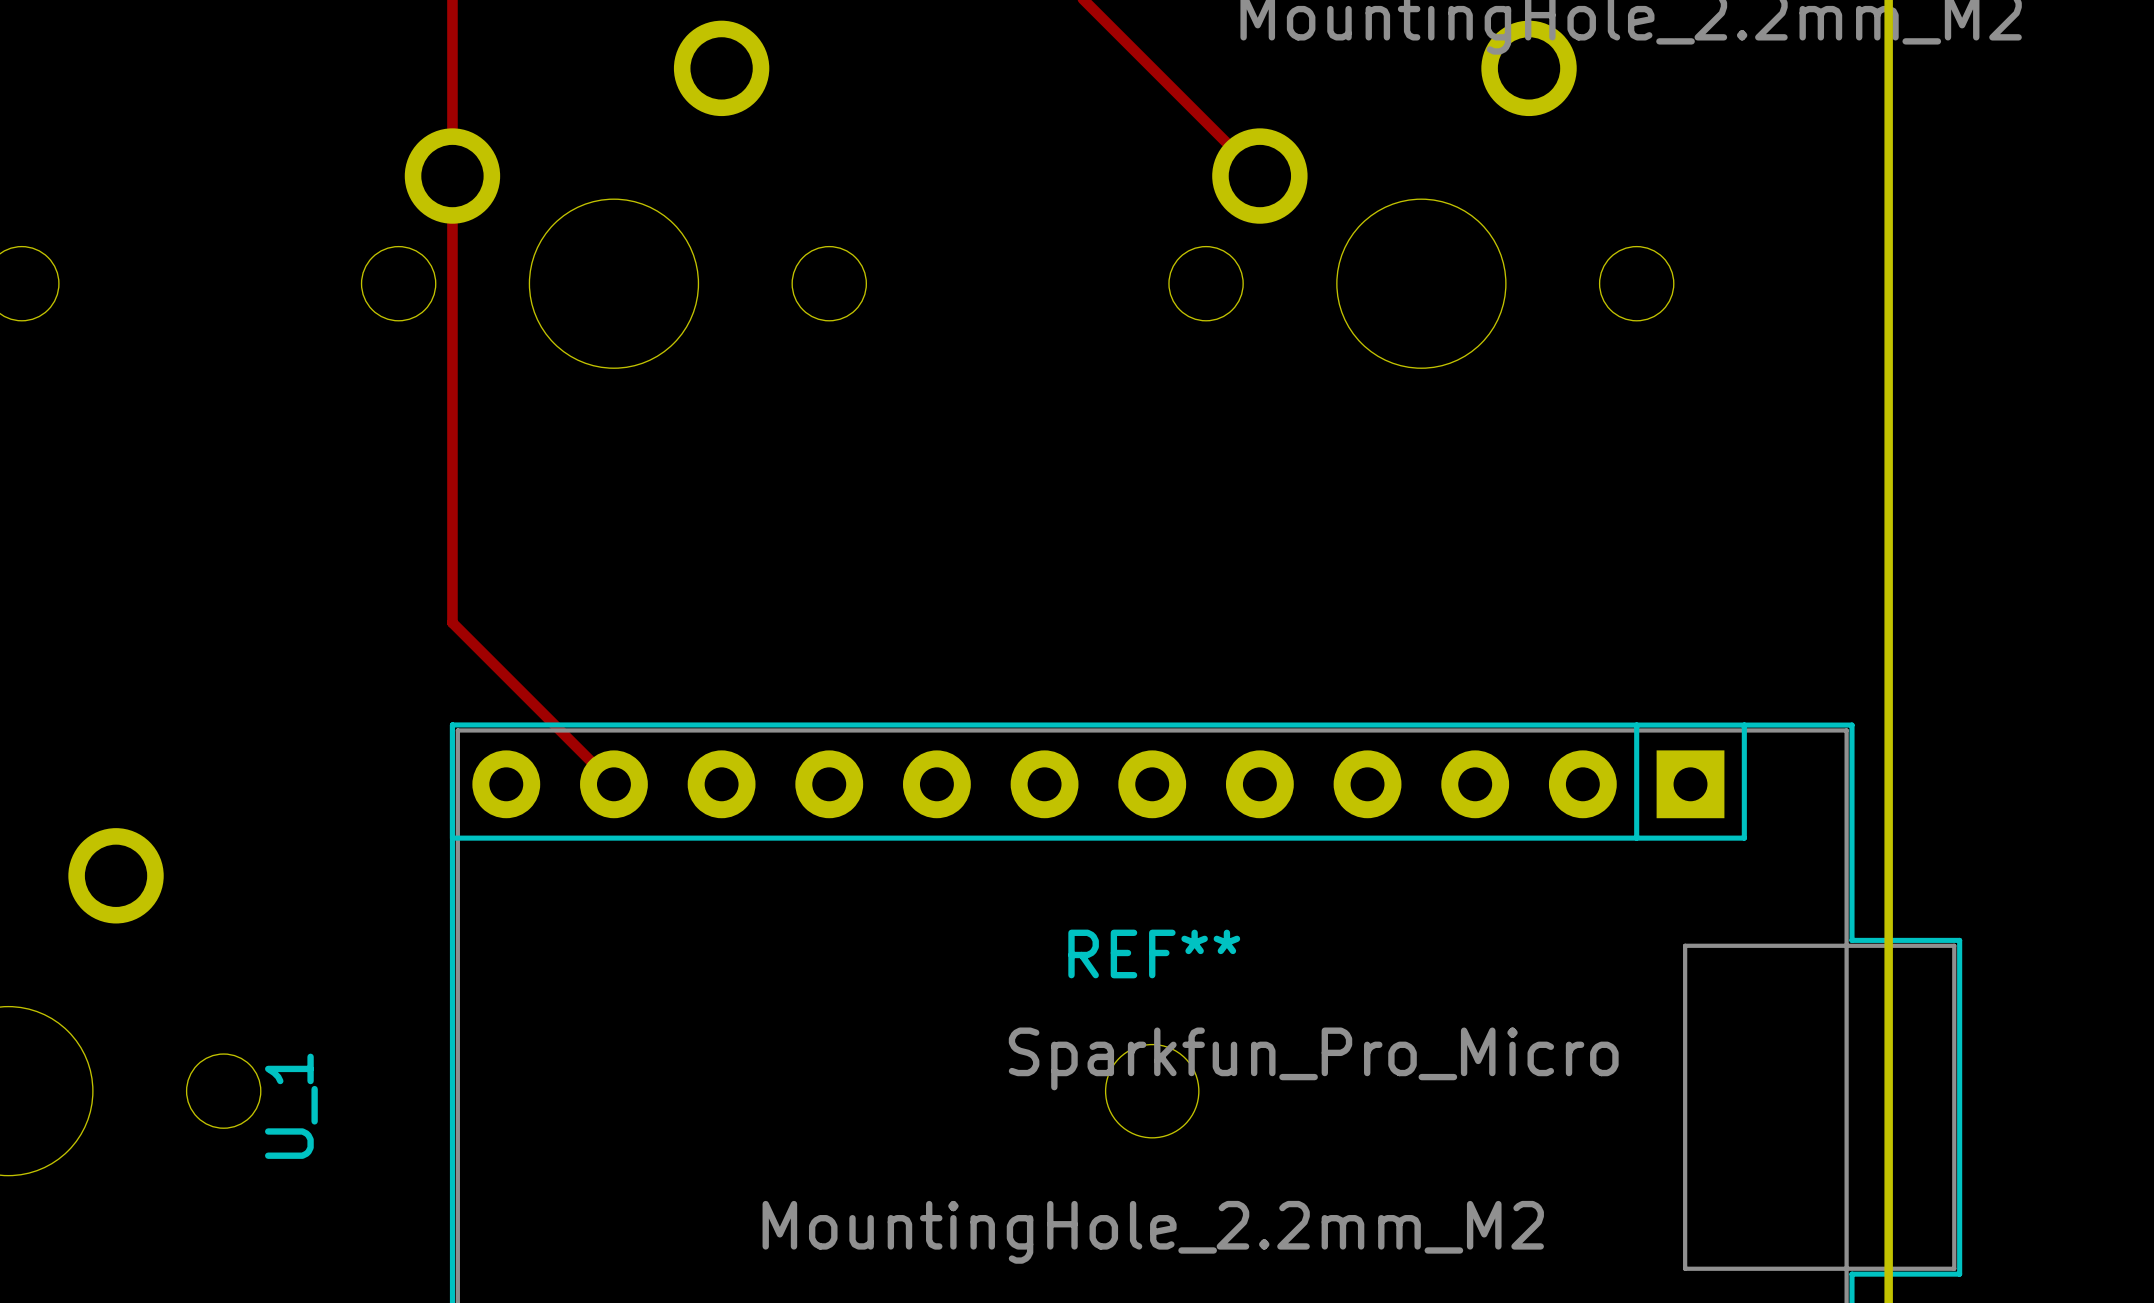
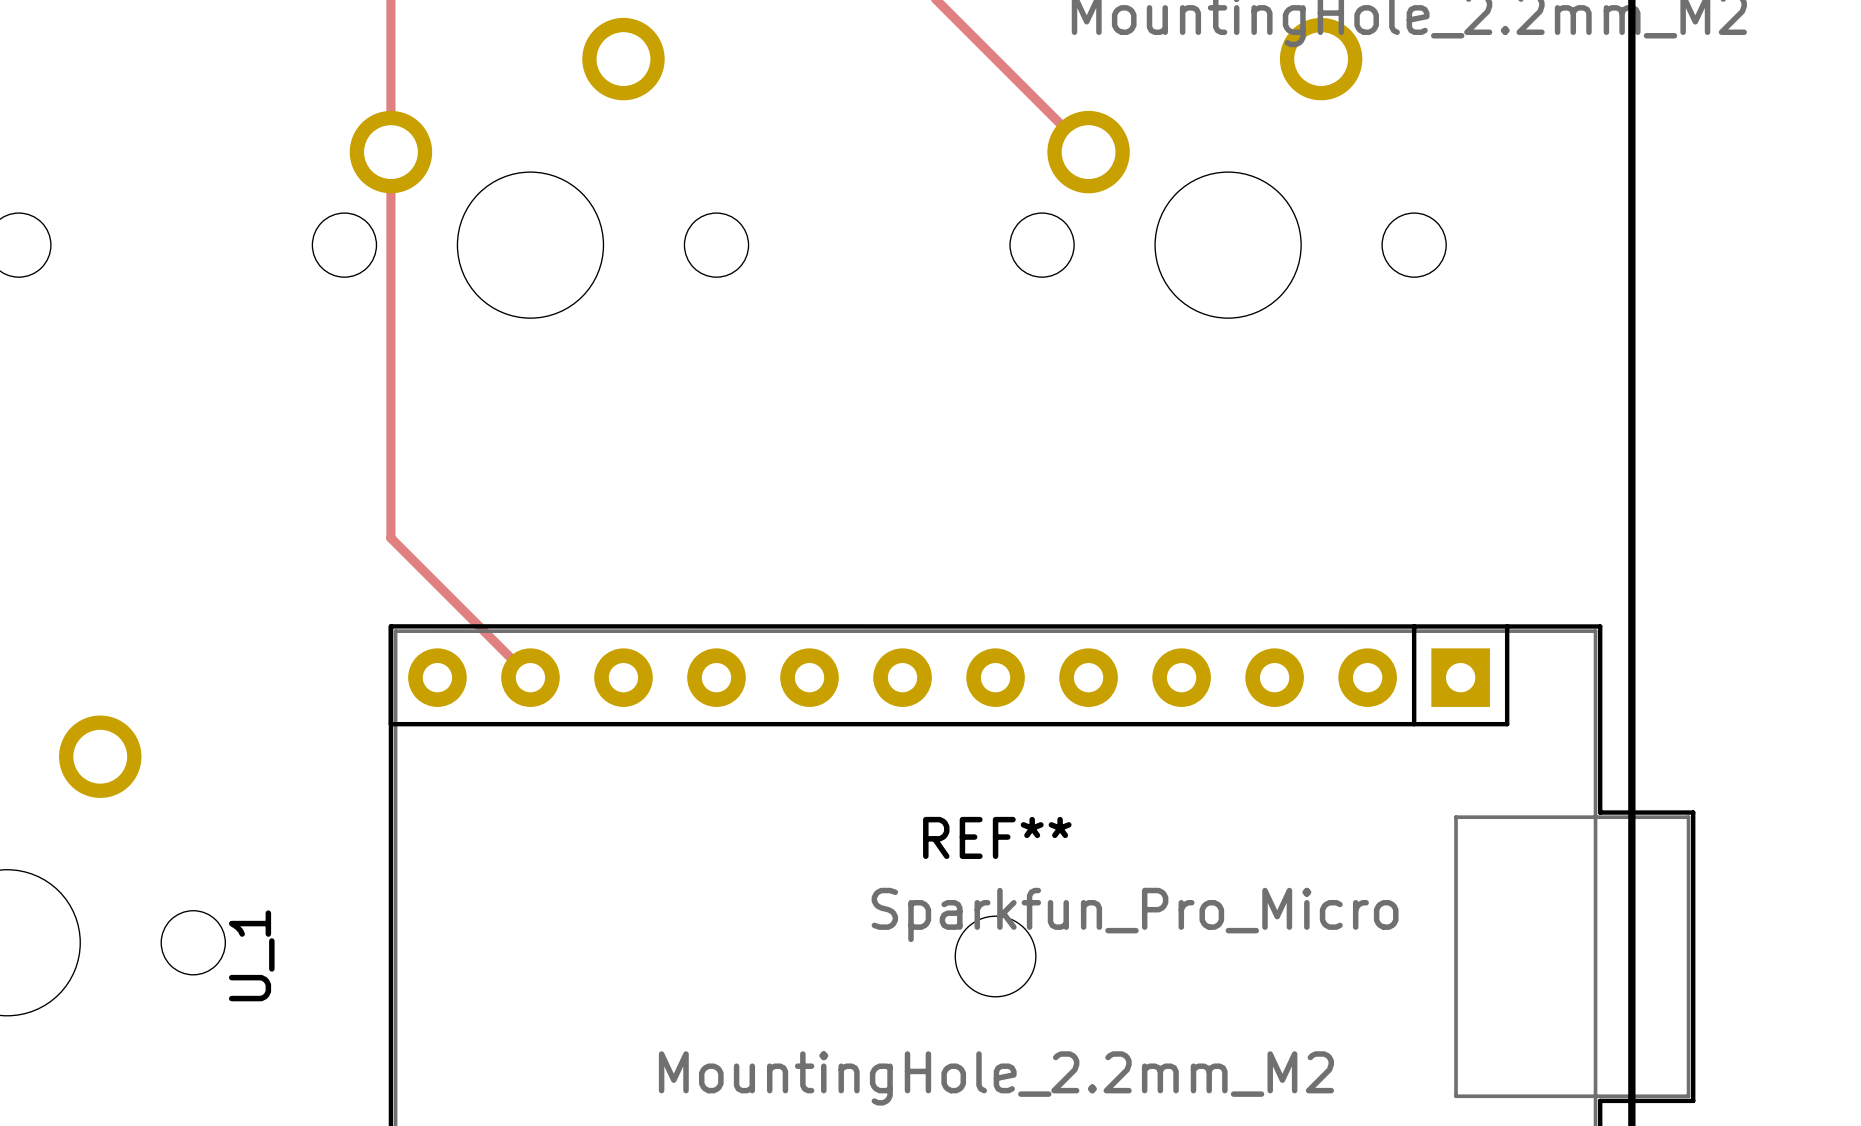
REF** position: (1152, 1091) -> (995, 956)

